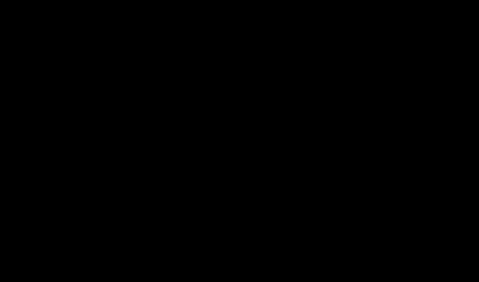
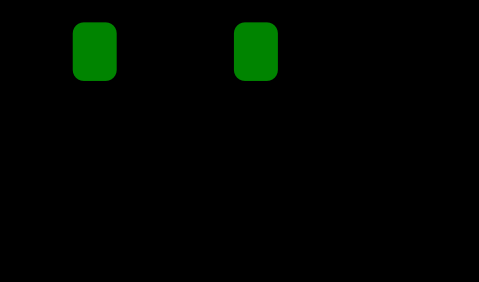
part: none -> (175, 51)

